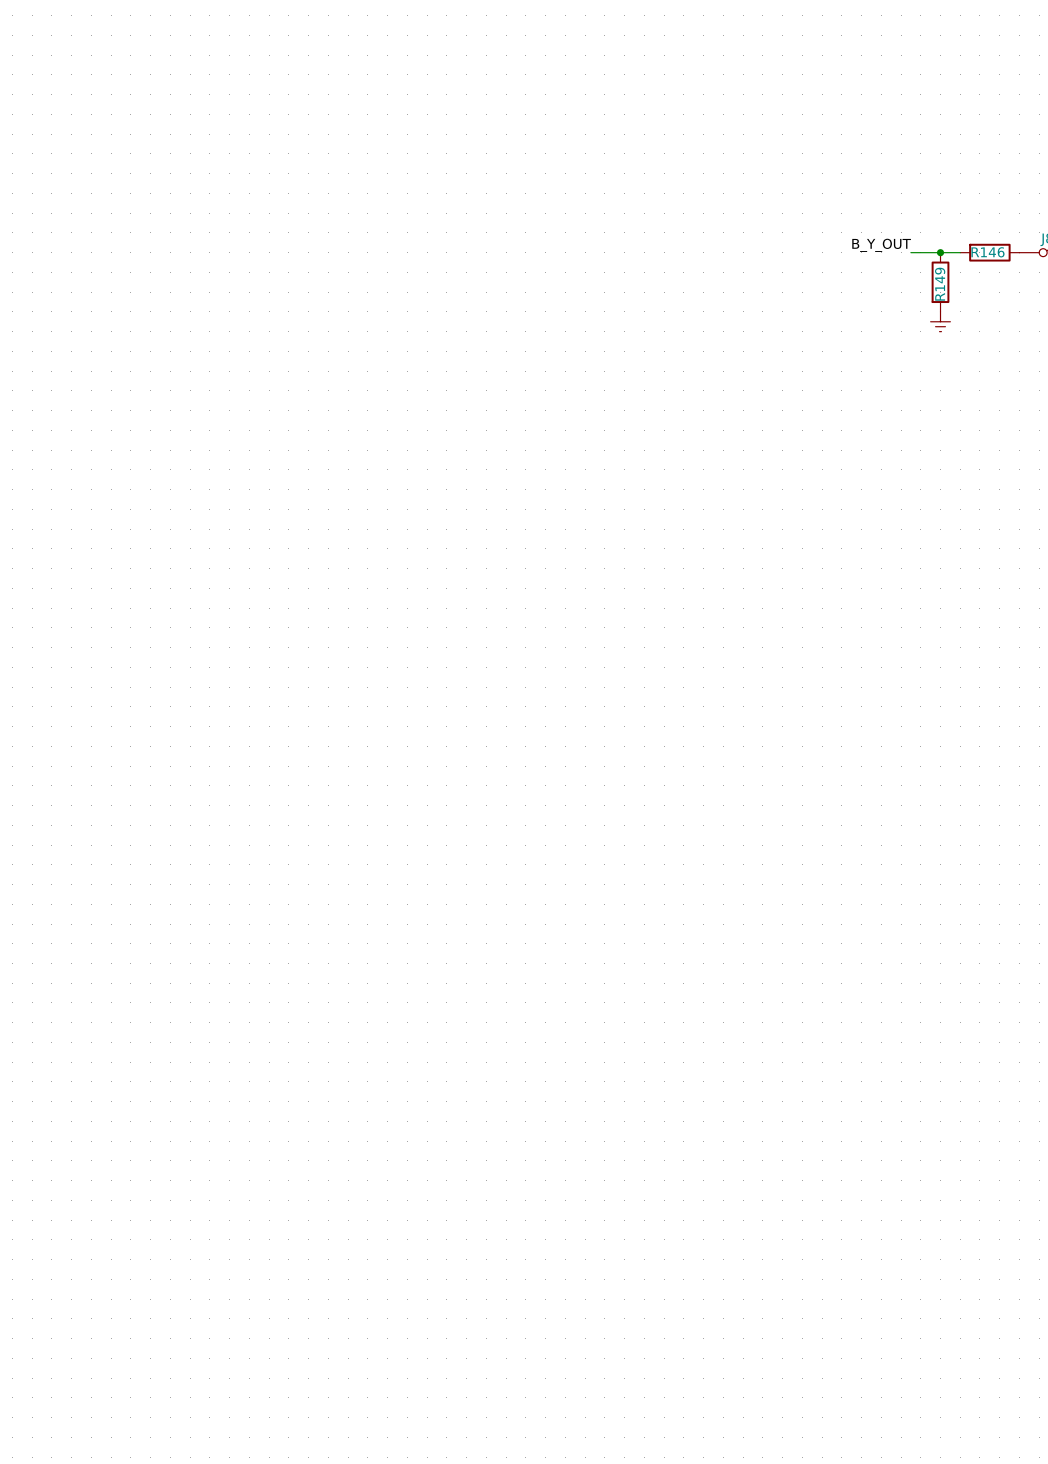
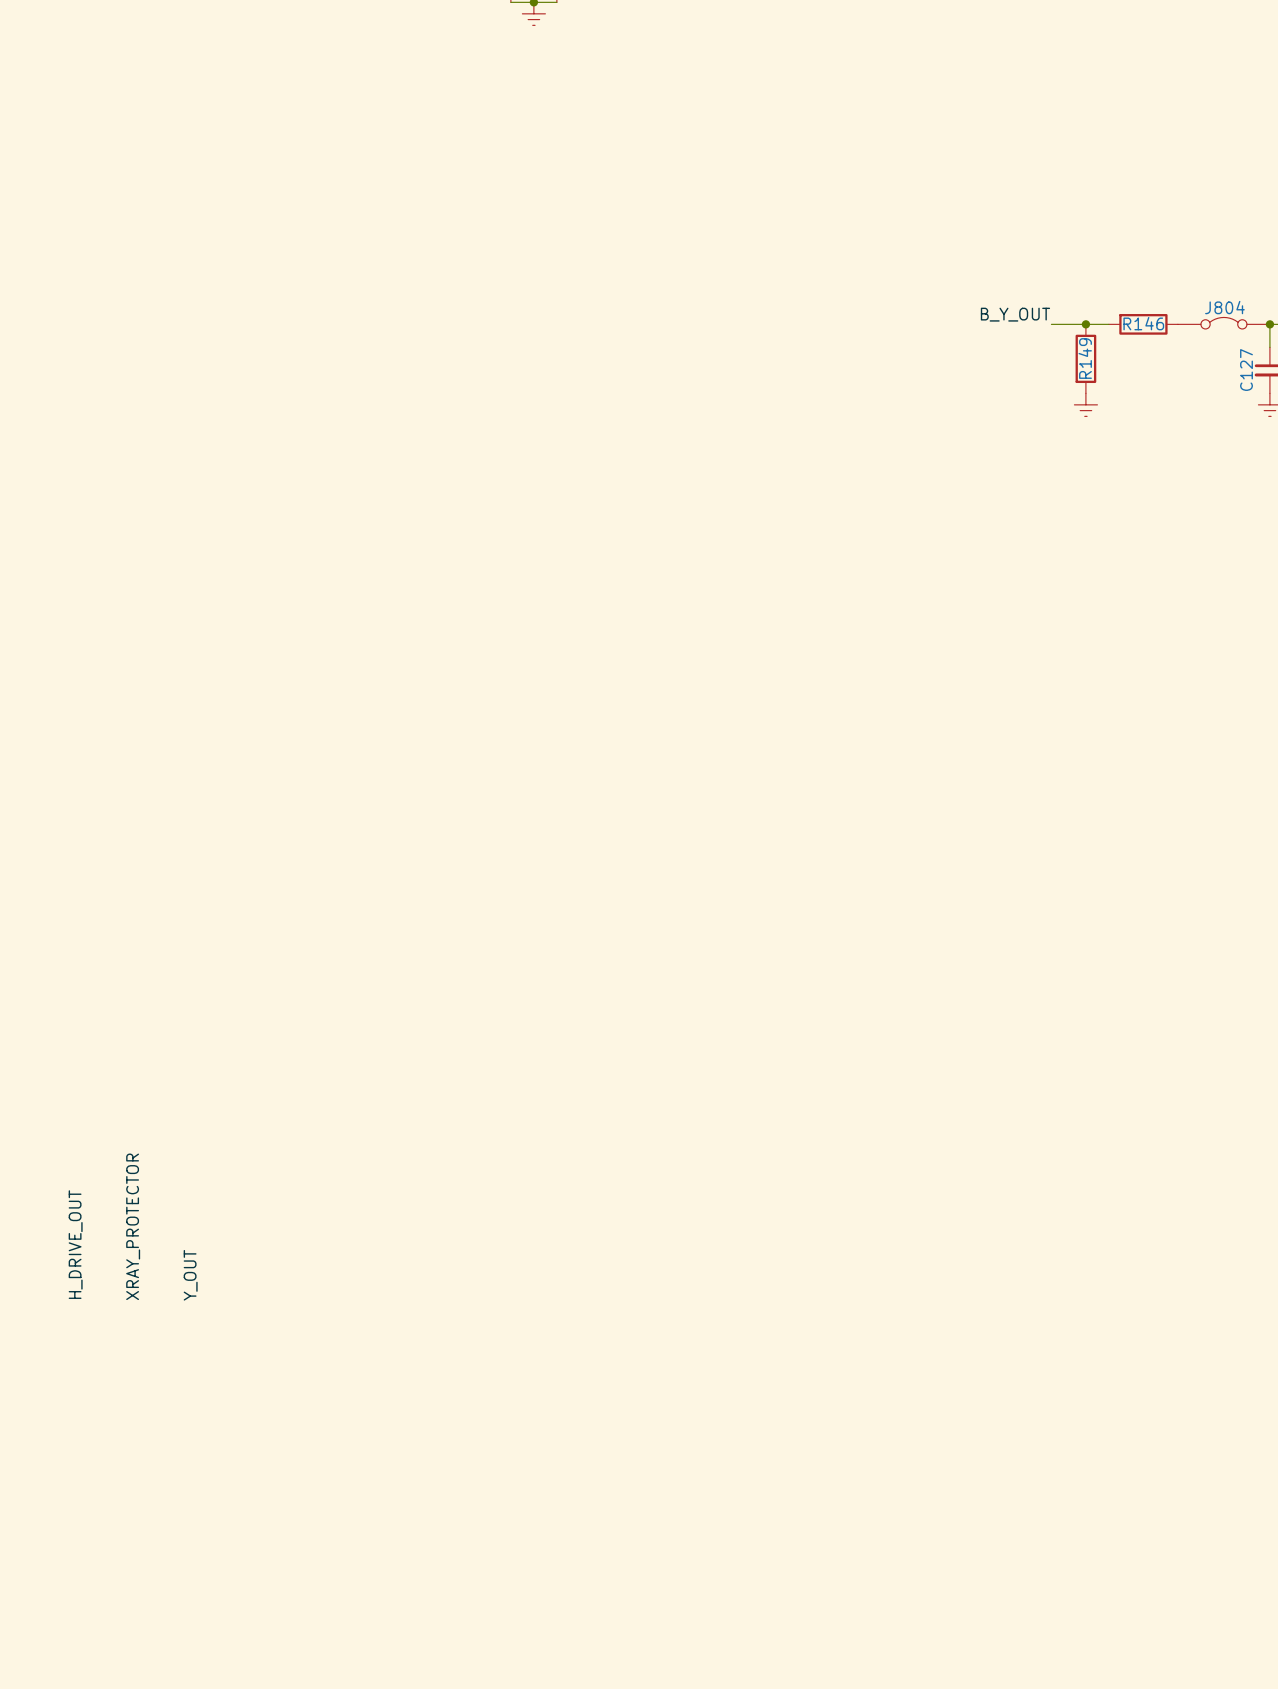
label: none -> XRAY_PROTECTOR (133, 1226)
label: none -> H_DRIVE_OUT (75, 1244)
label: none -> Y_OUT (190, 1275)

